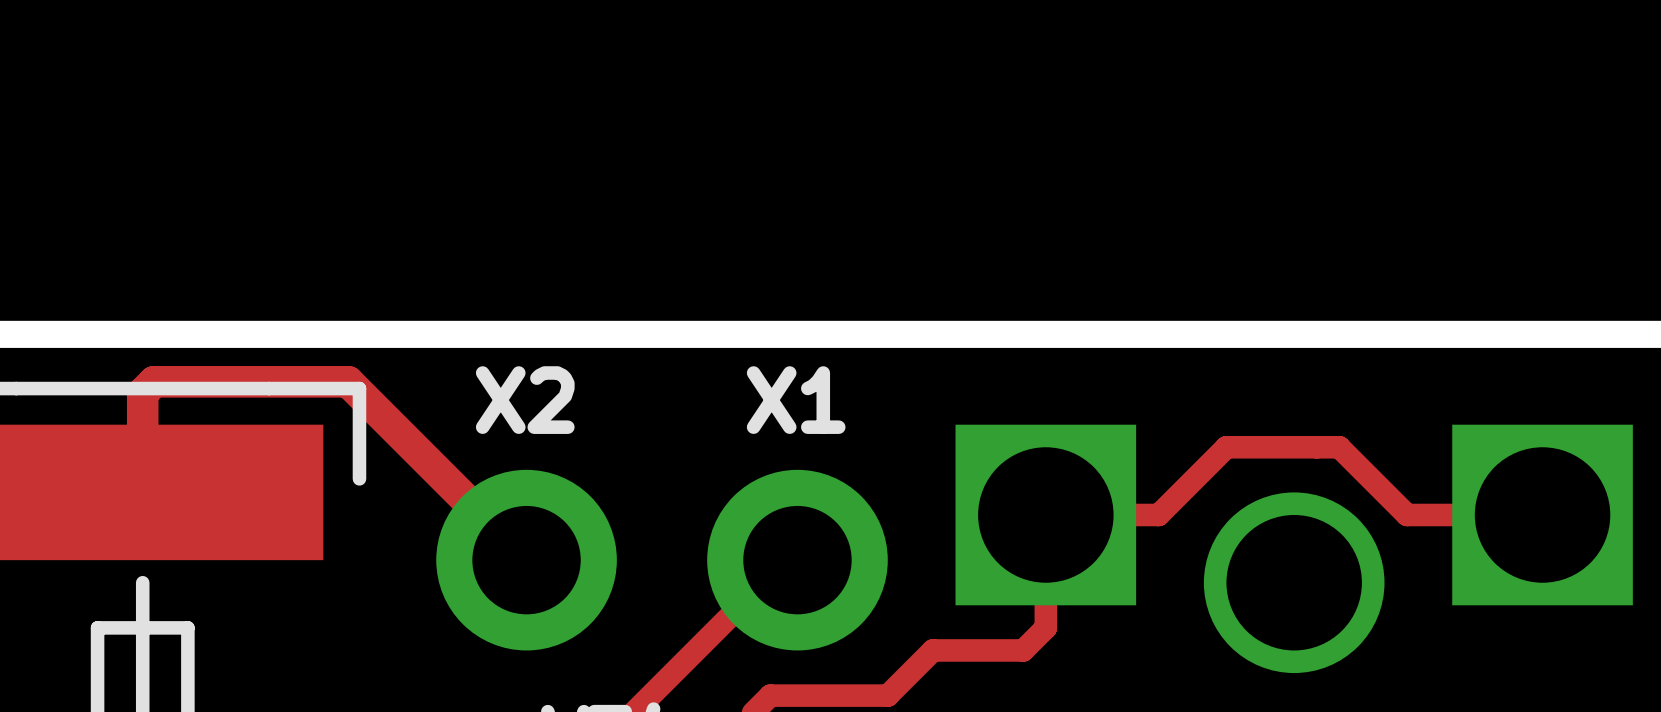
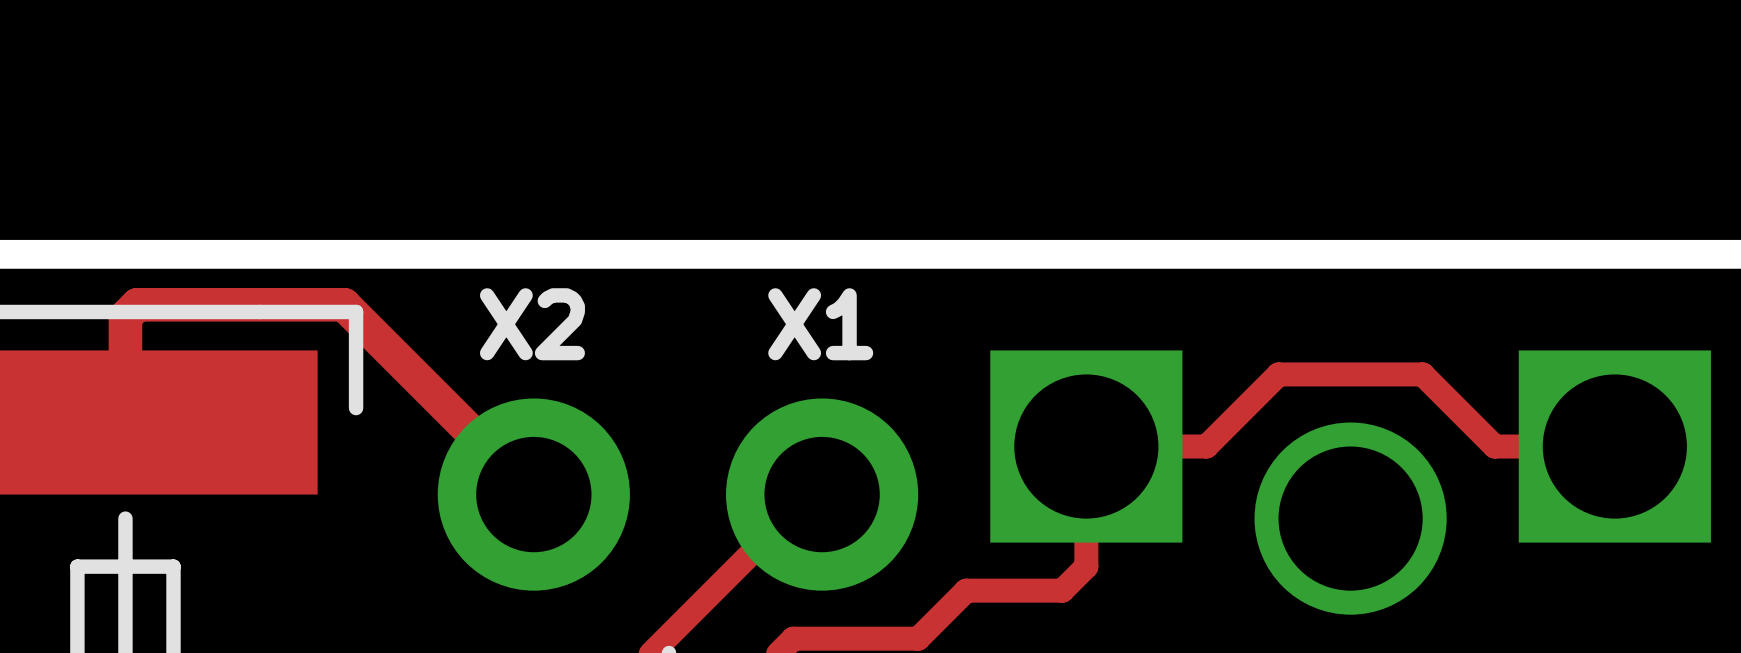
track: (1339, 447) (1407, 515) (1429, 515) -> (1398, 374) (1422, 374) (1494, 446)

